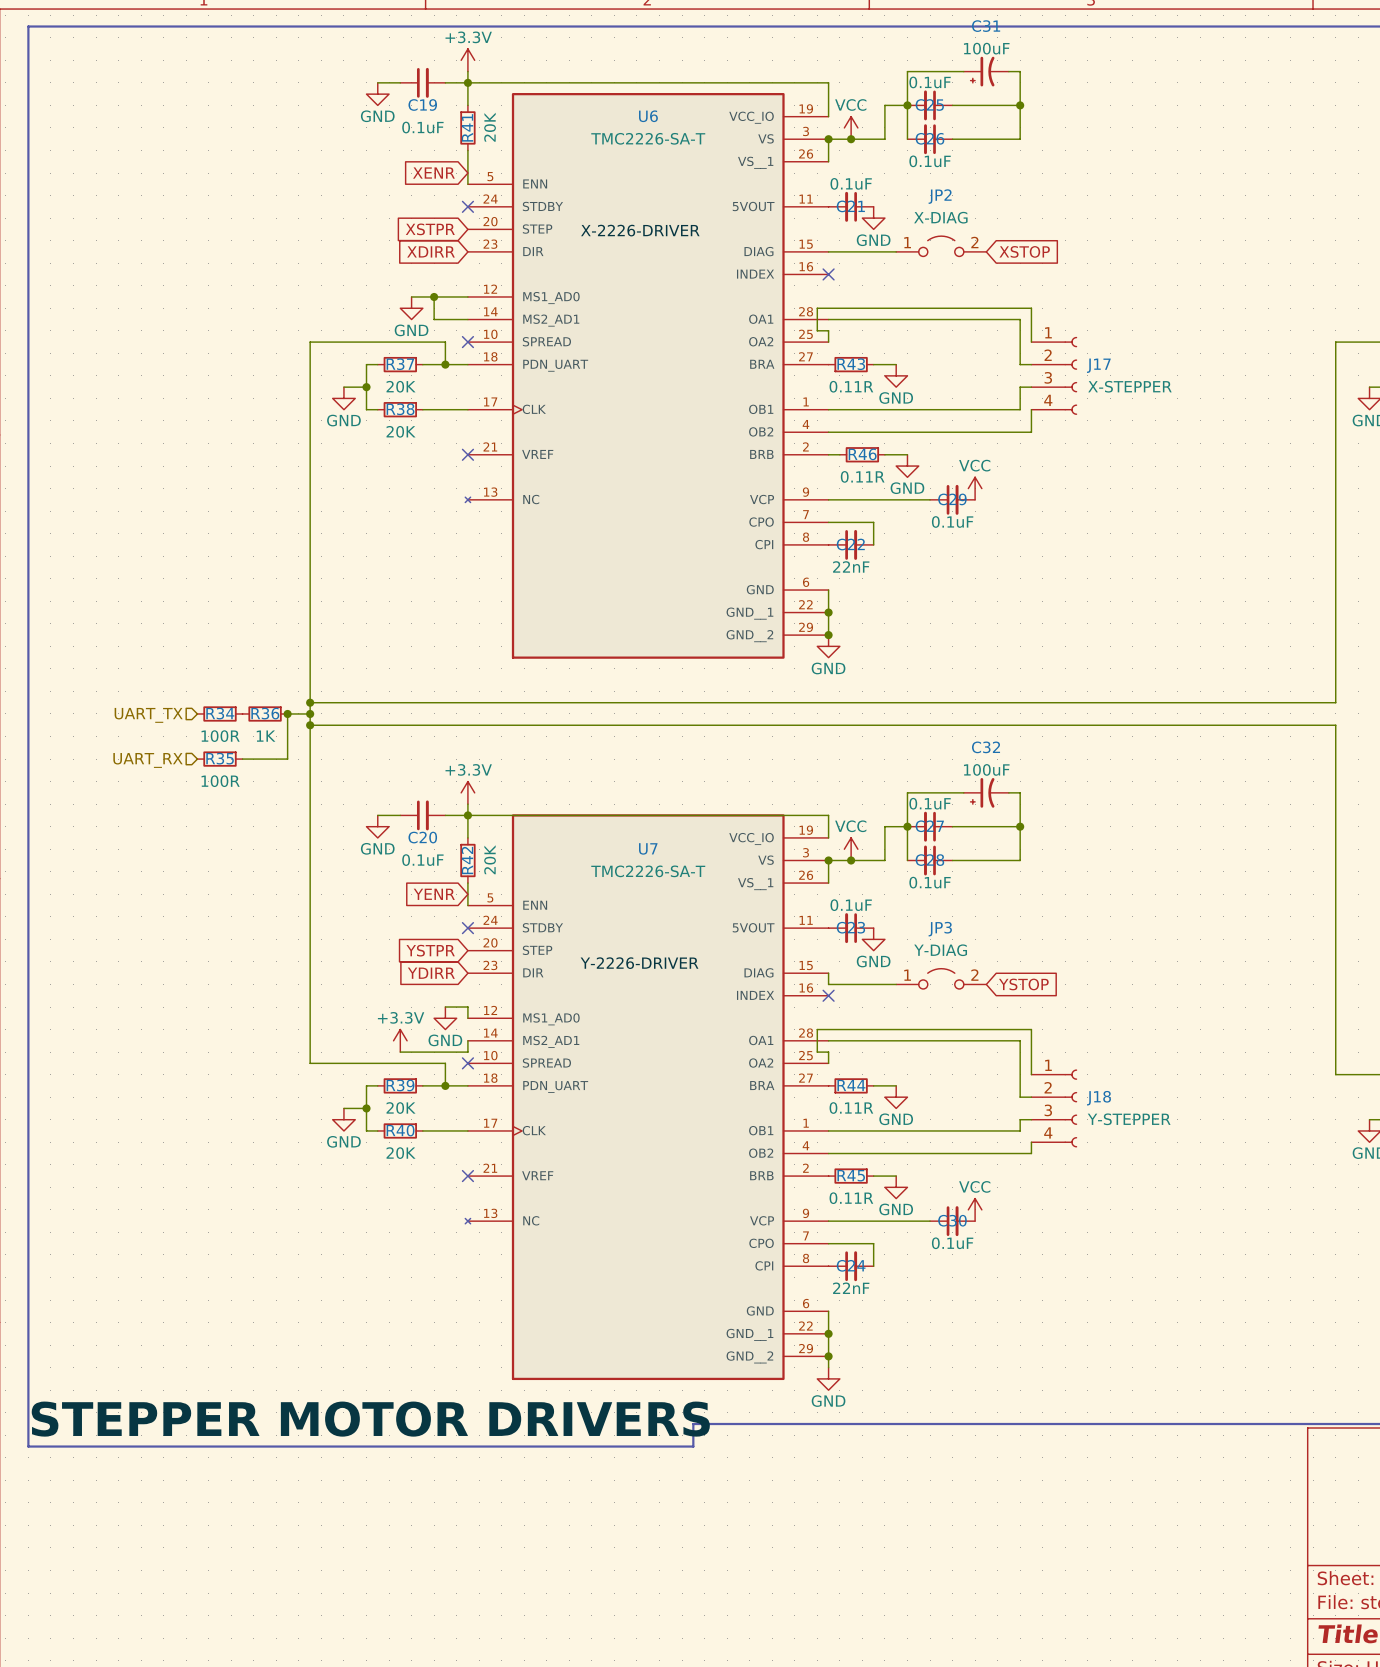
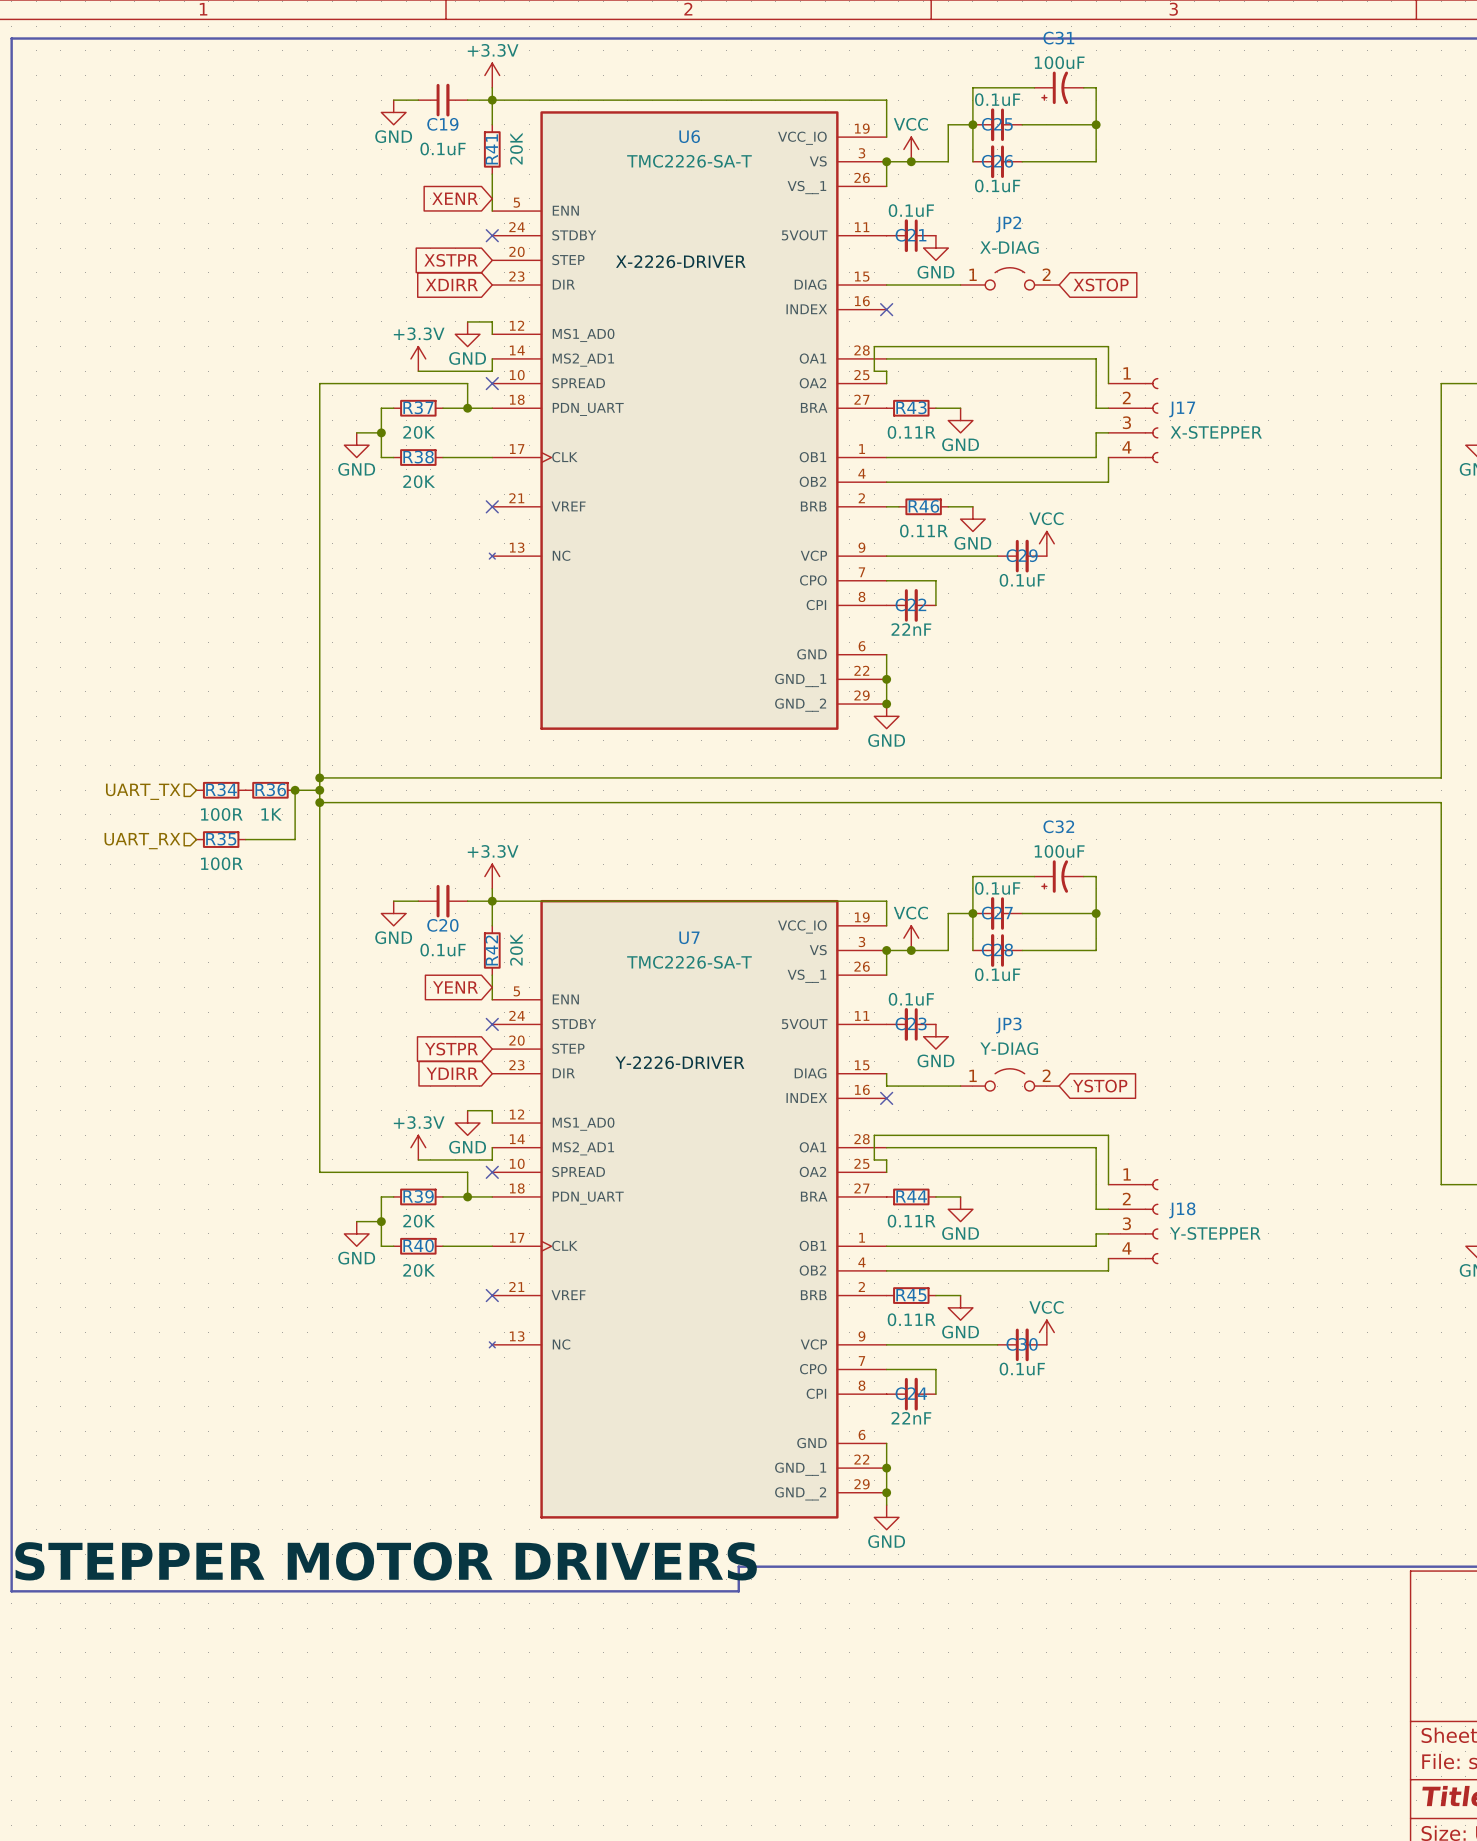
wire: (411, 296) (467, 296) -> (467, 321) (492, 321) (492, 334)
wire: (434, 296) (434, 319) (467, 319) -> (418, 371) (492, 371) (492, 358)
junction: (434, 296) -> none
power symbol position: GND (411, 308) -> GND (467, 334)
power symbol: none -> +3.3V (418, 358)

